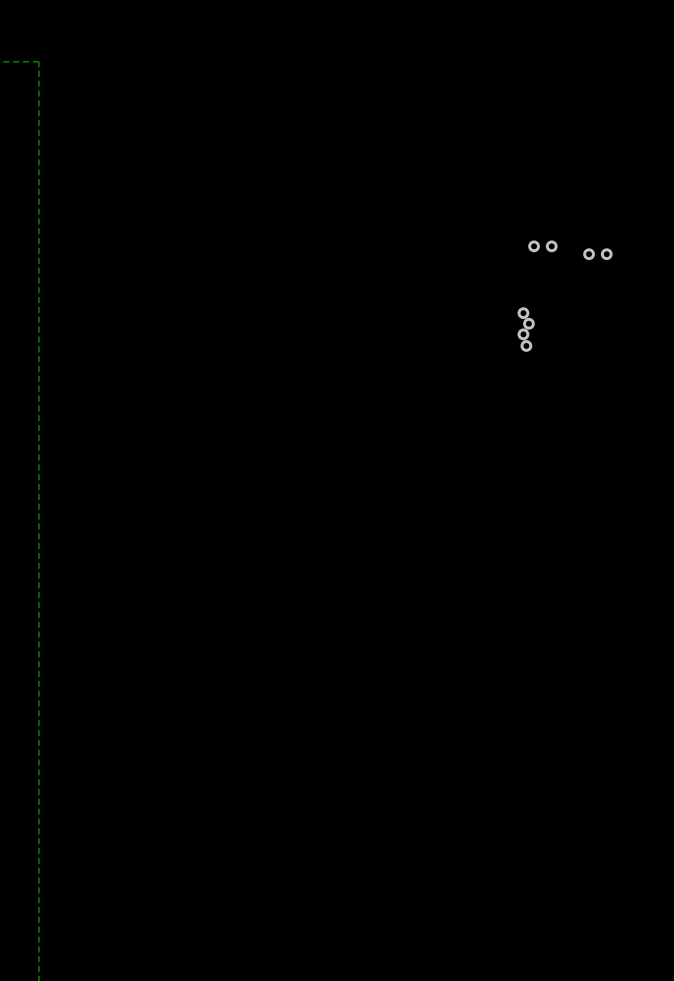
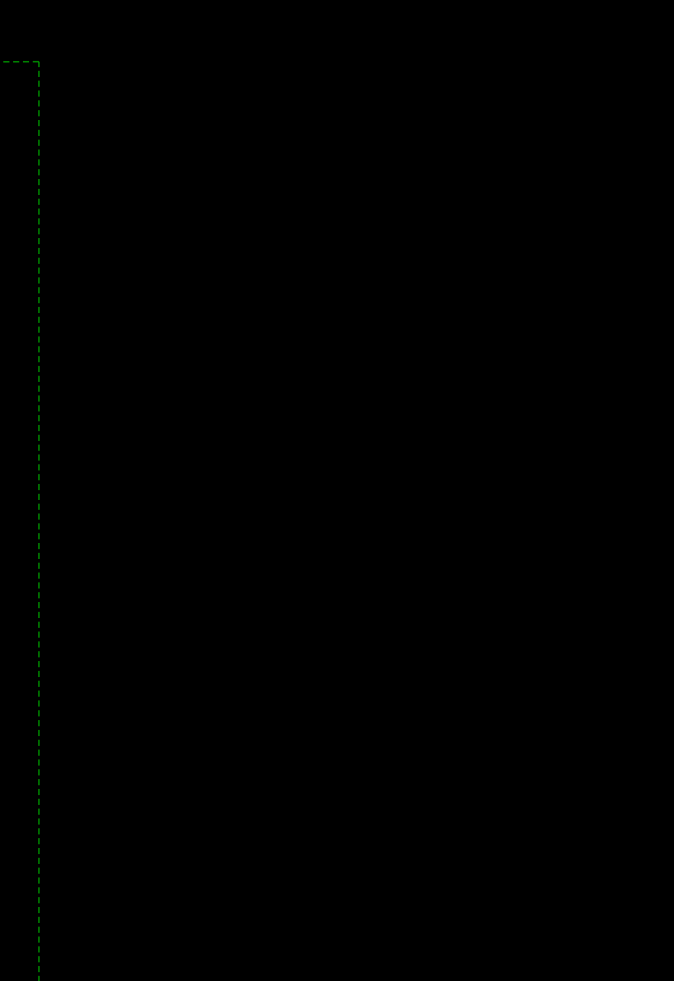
via: (534, 246) -> none
via: (551, 246) -> none
via: (589, 254) -> none
via: (606, 254) -> none
via: (523, 313) -> none
via: (528, 323) -> none
via: (523, 334) -> none
via: (526, 345) -> none

